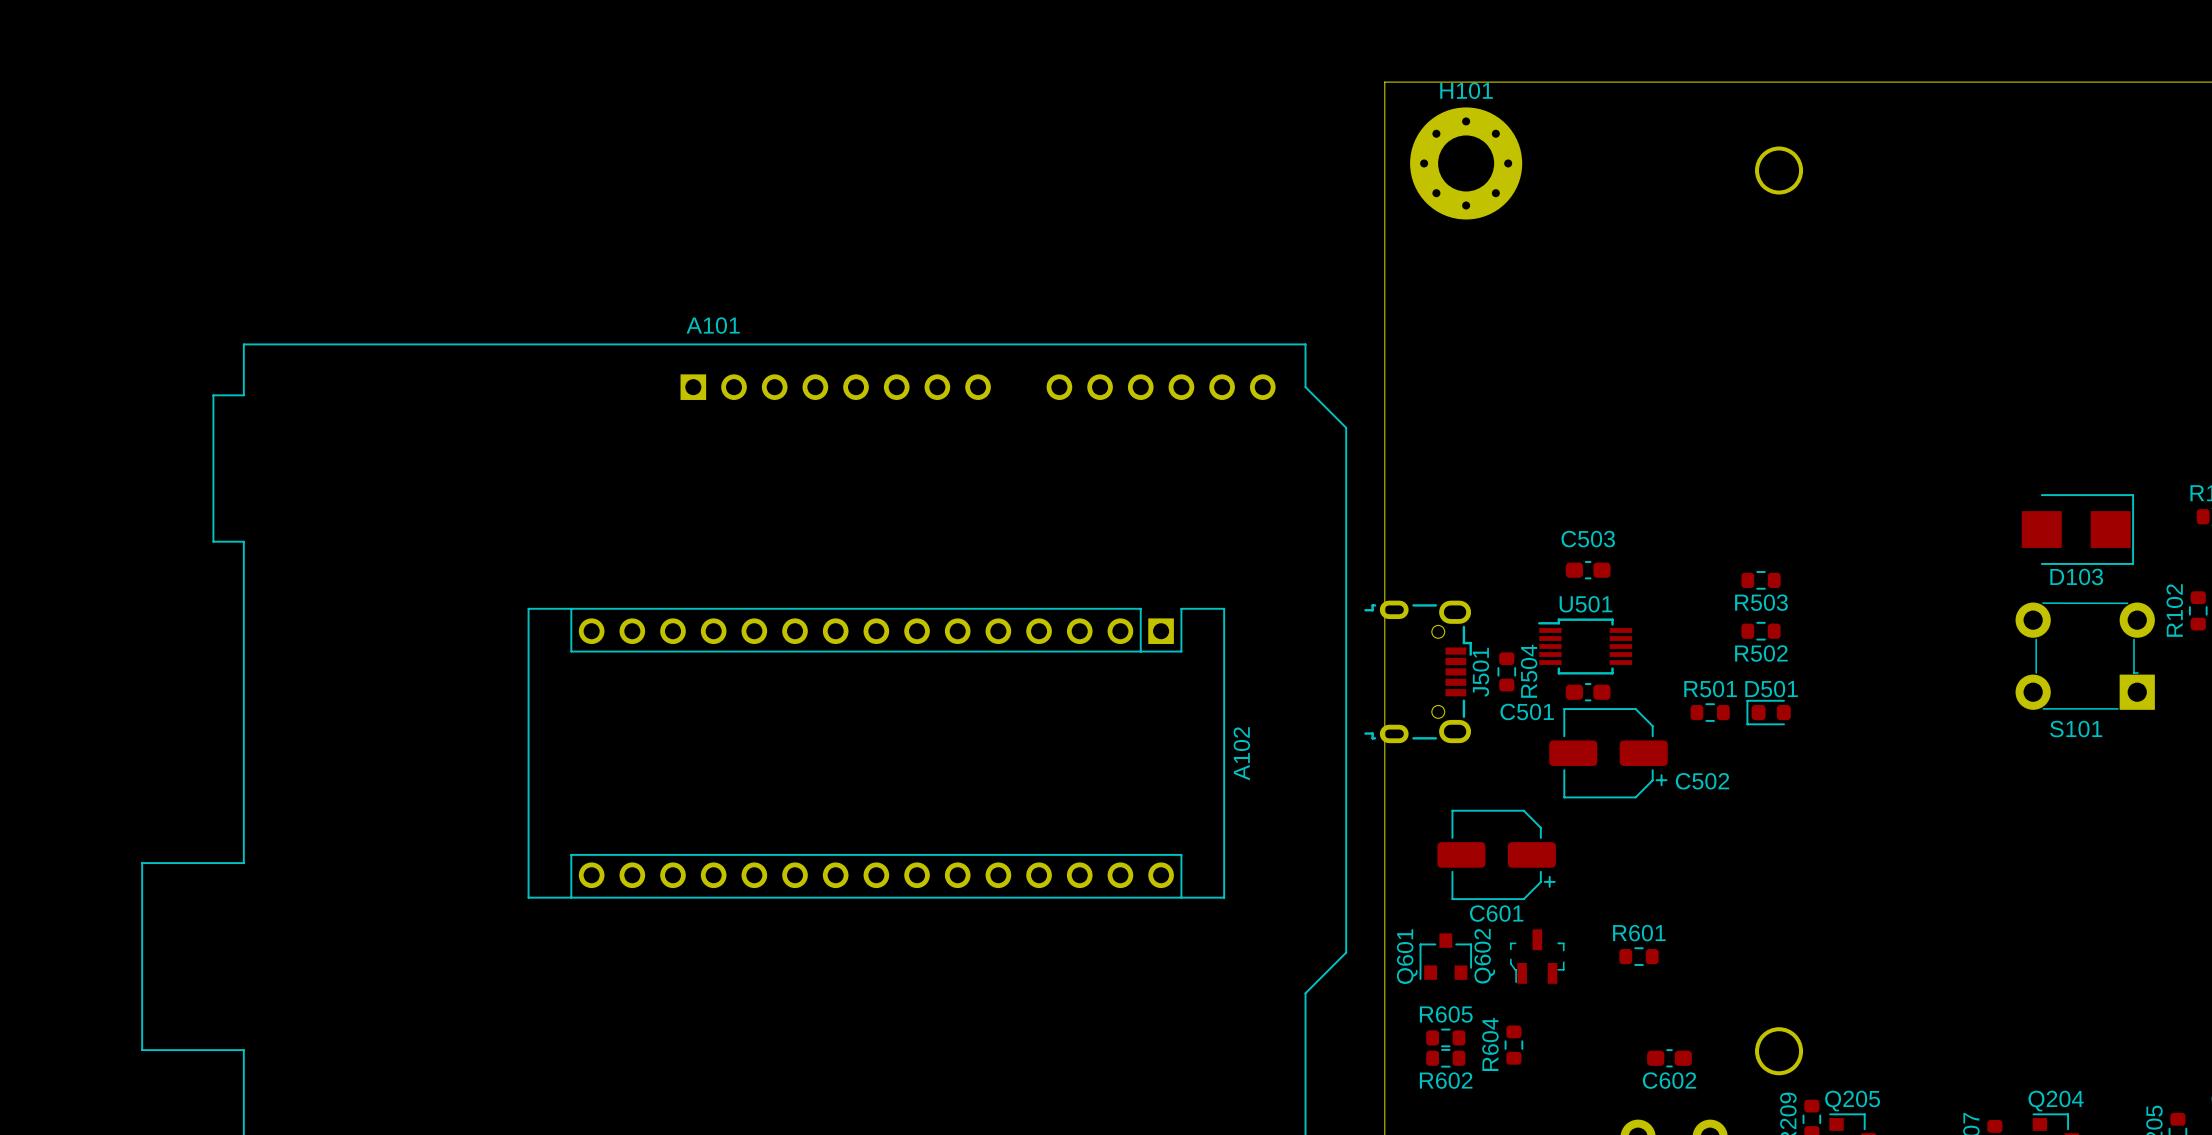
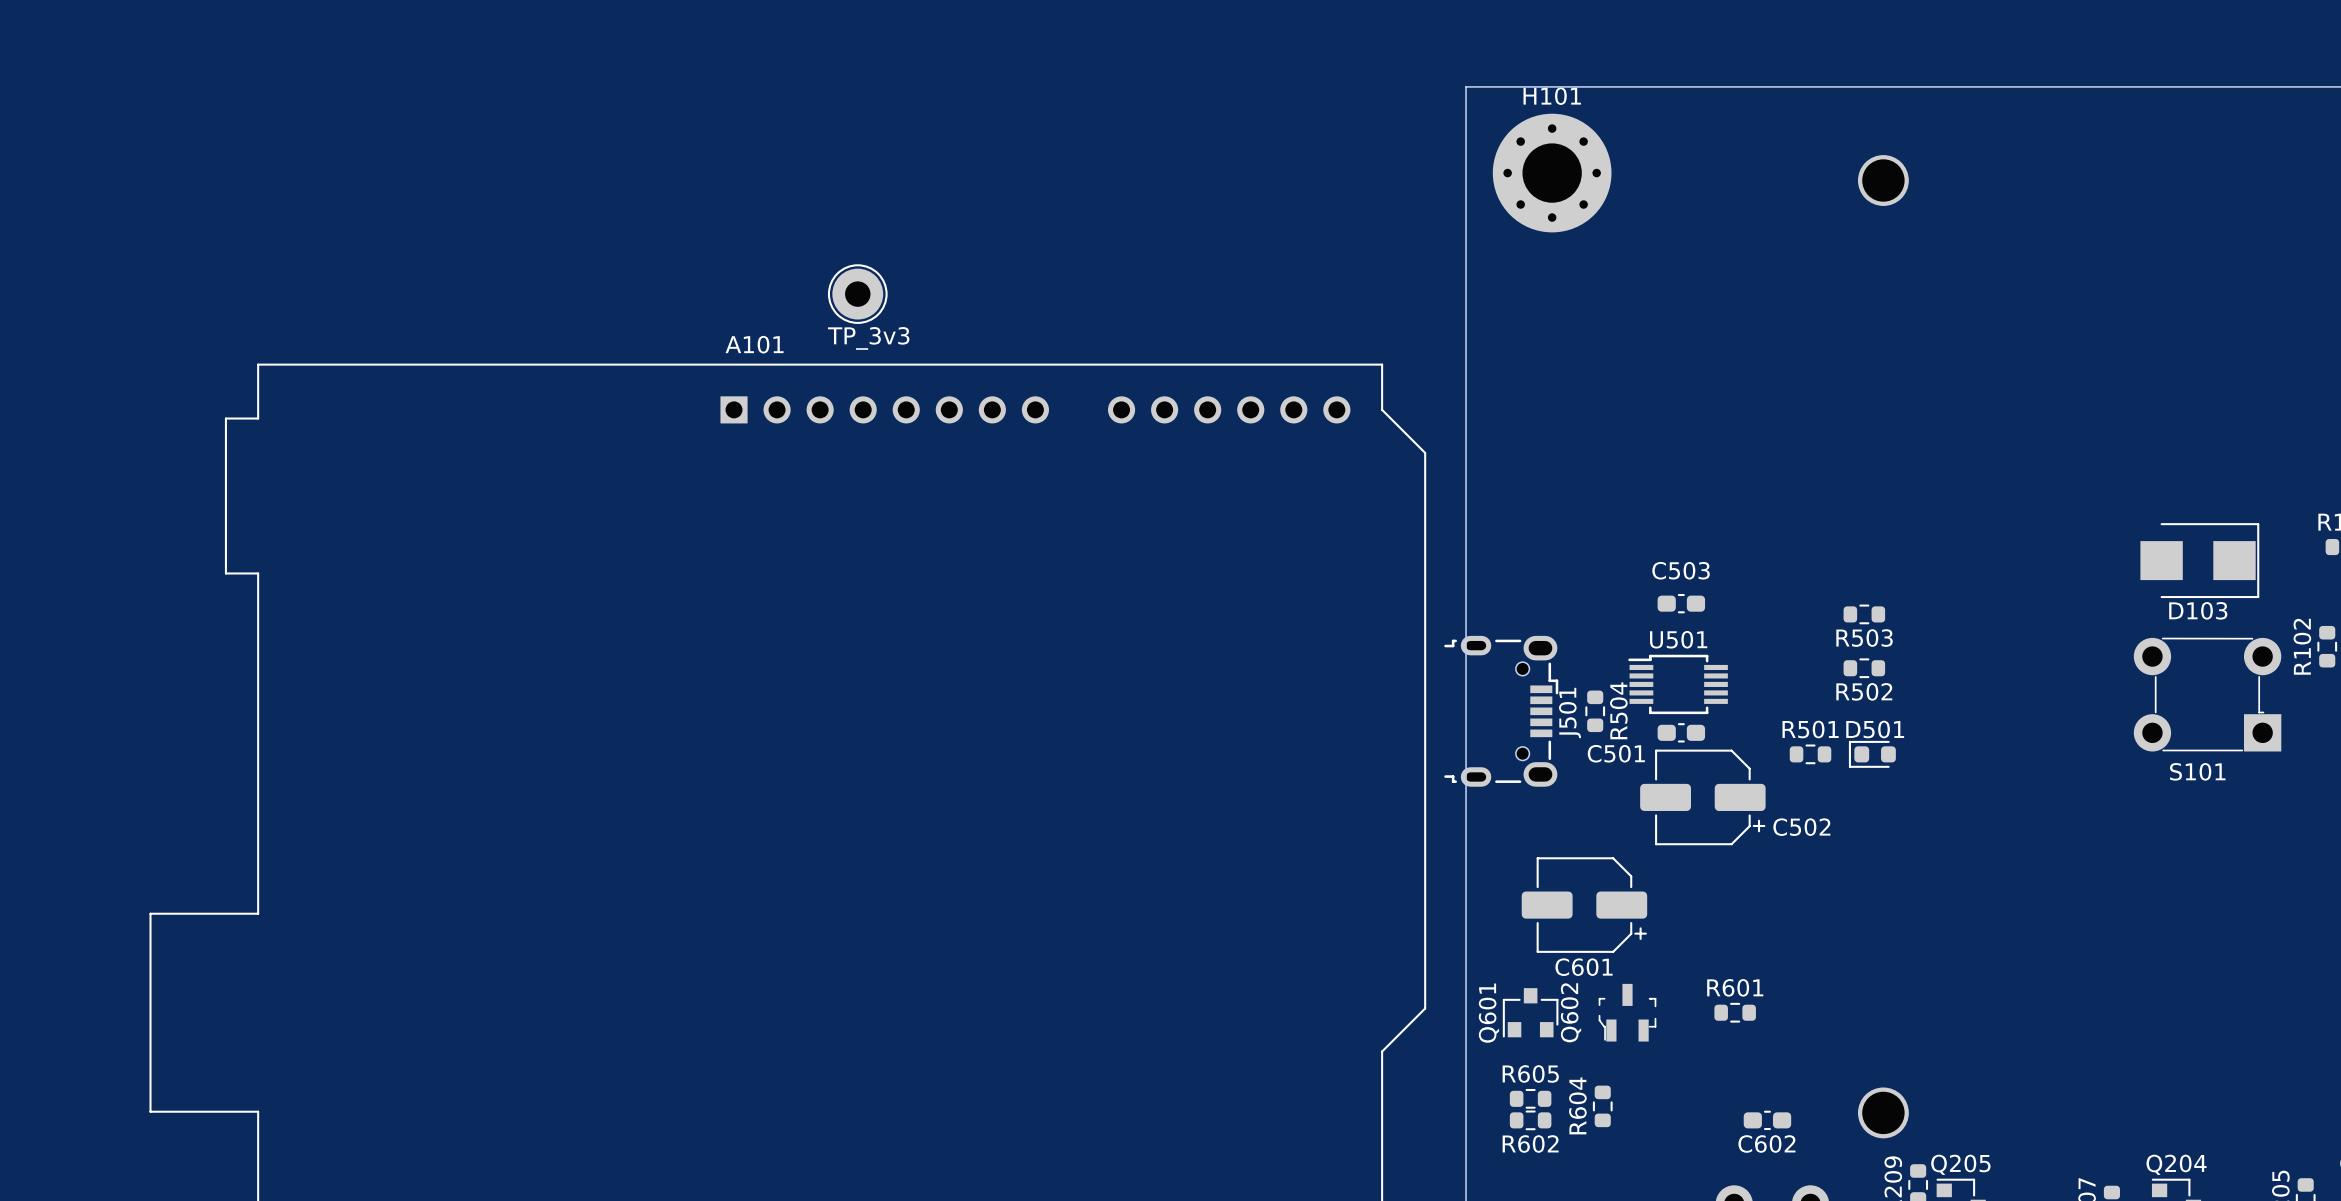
TP_3v3: none -> (857, 294)
A102: (876, 753) -> none

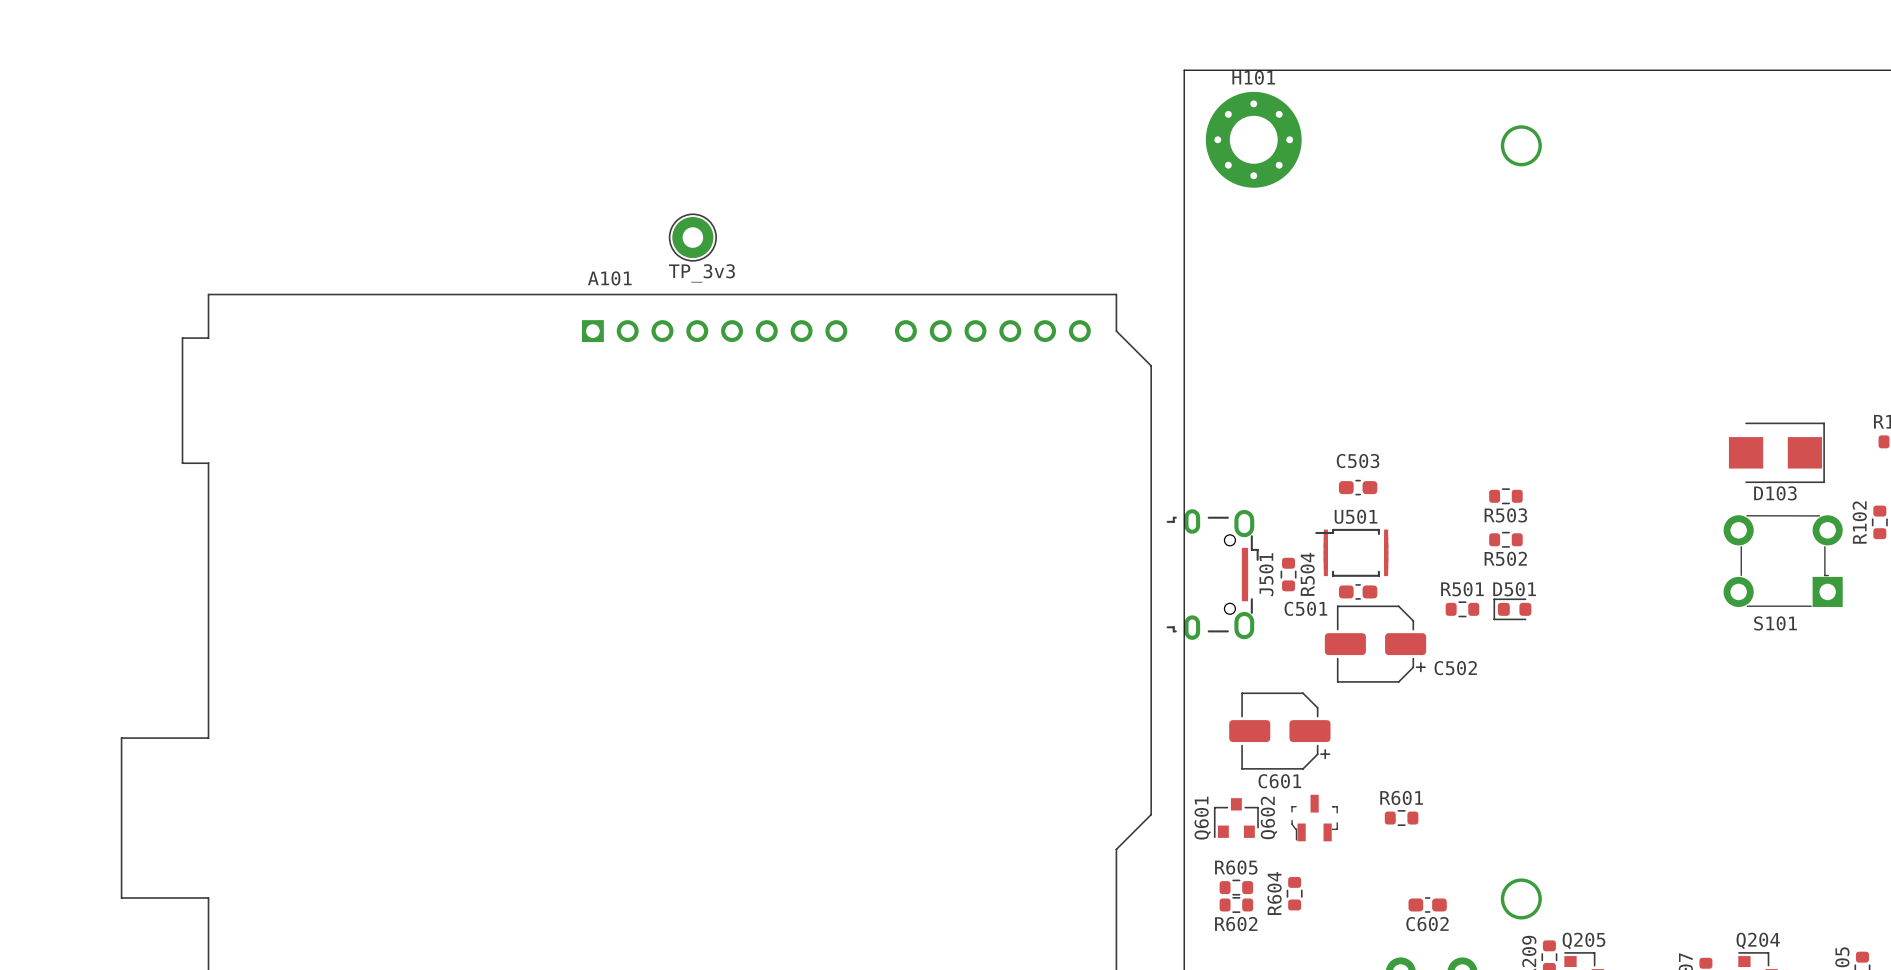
J501 footprint: [1444, 635, 1559, 787] -> [1166, 509, 1259, 640]
U501 footprint: [1628, 654, 1728, 715] -> [1315, 528, 1389, 577]

